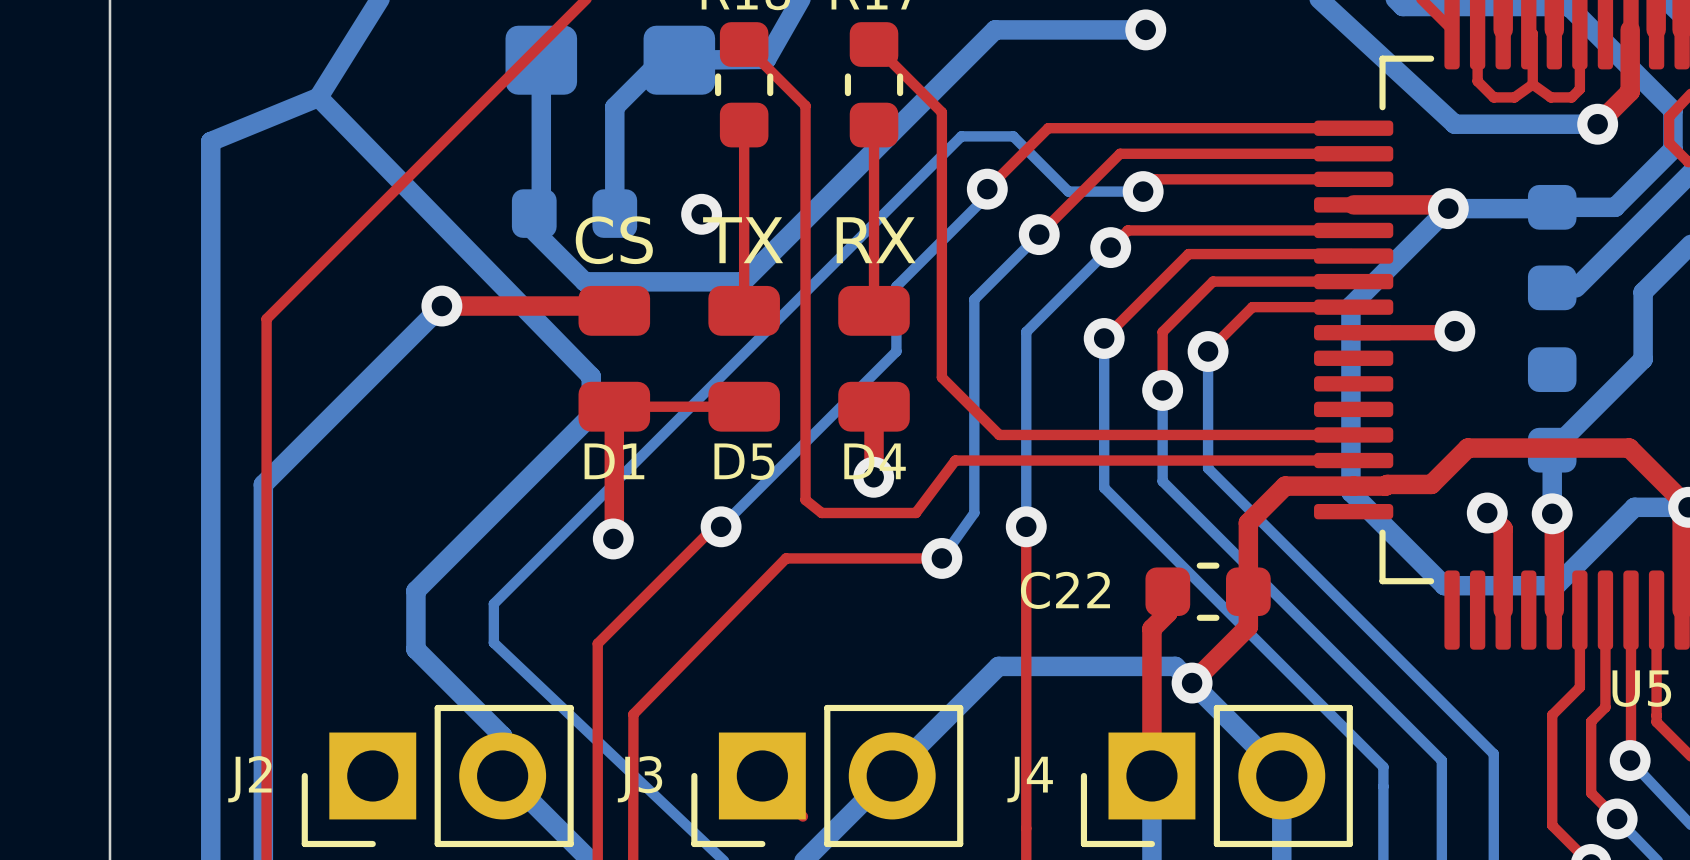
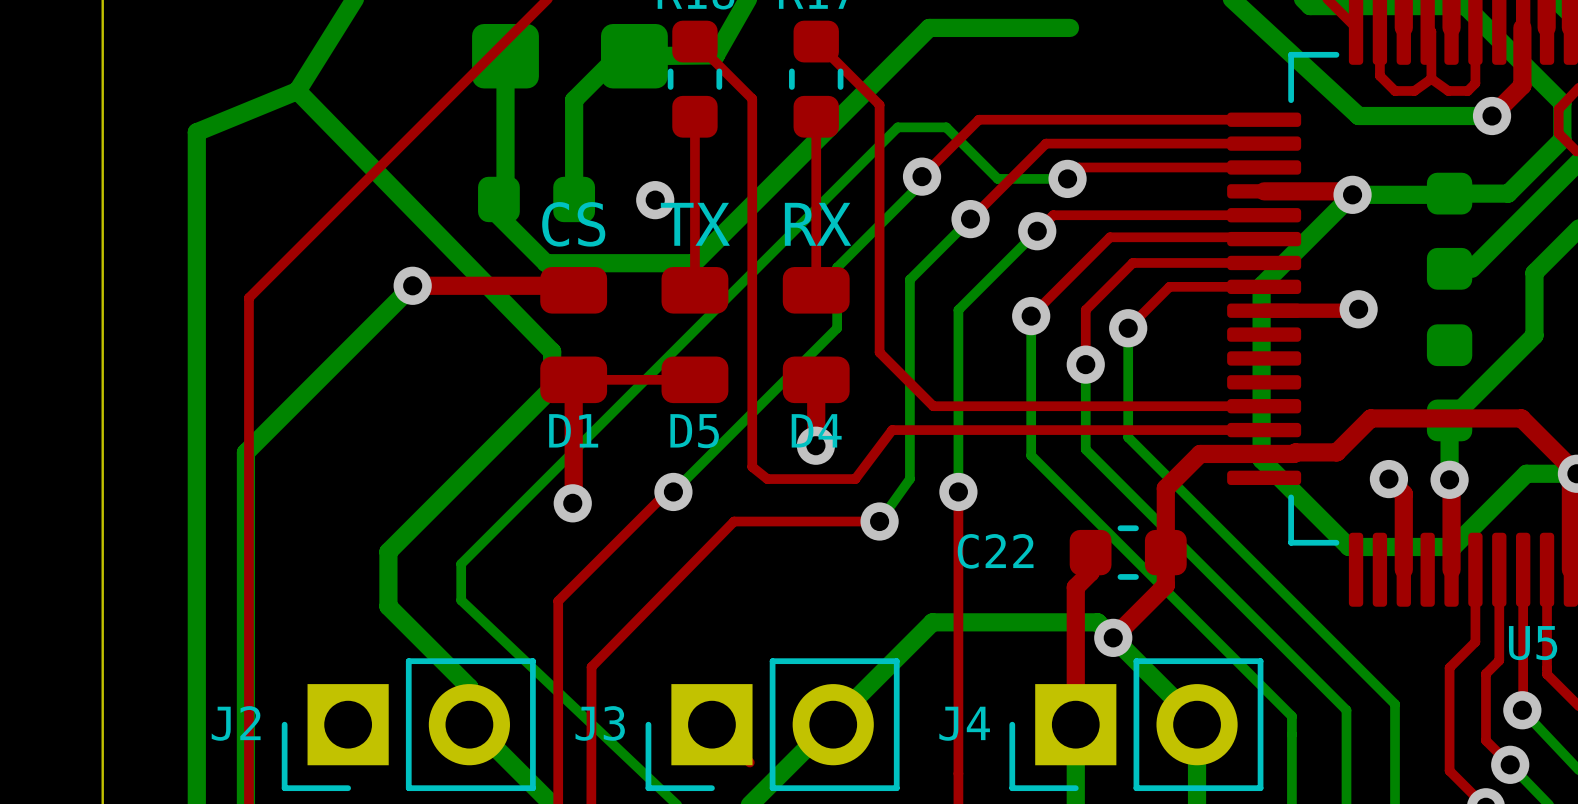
via: (1145, 29) -> none

